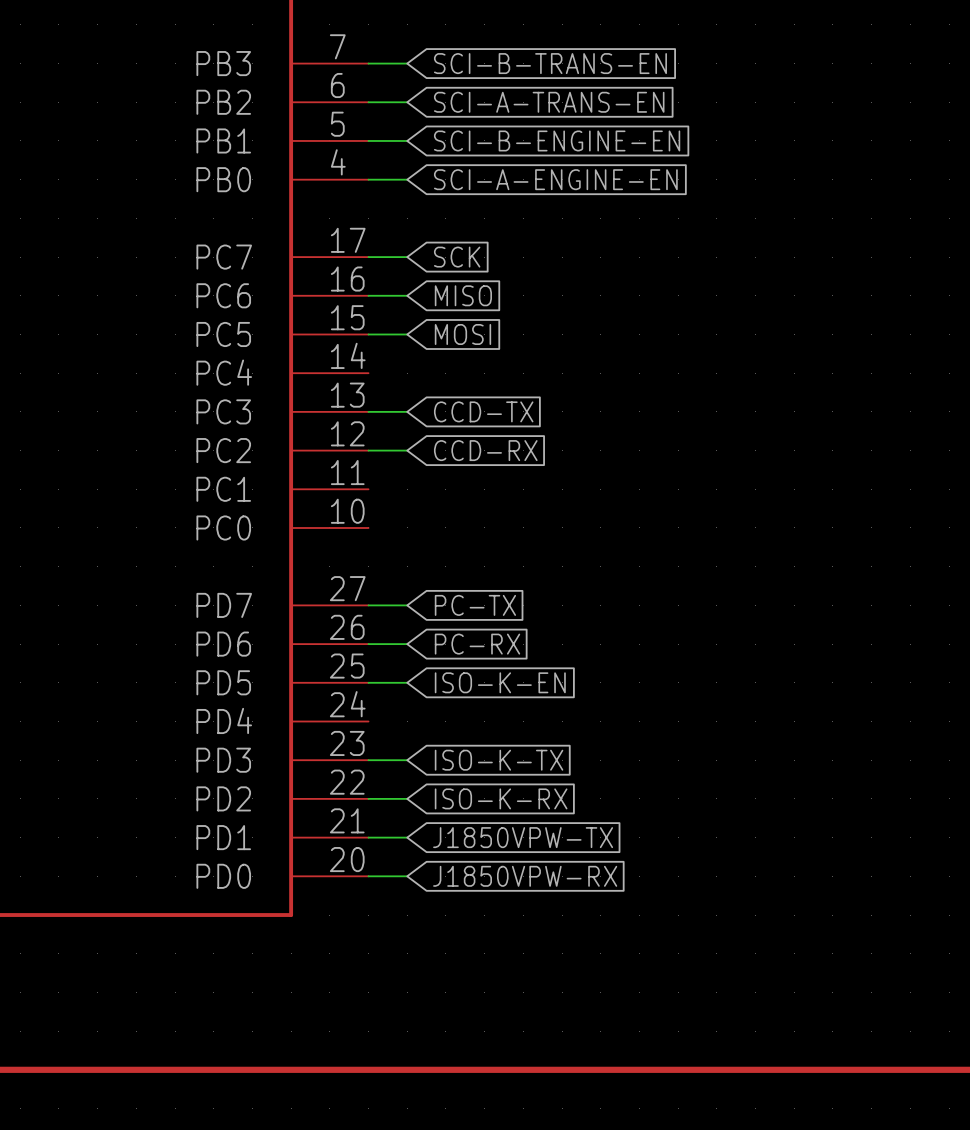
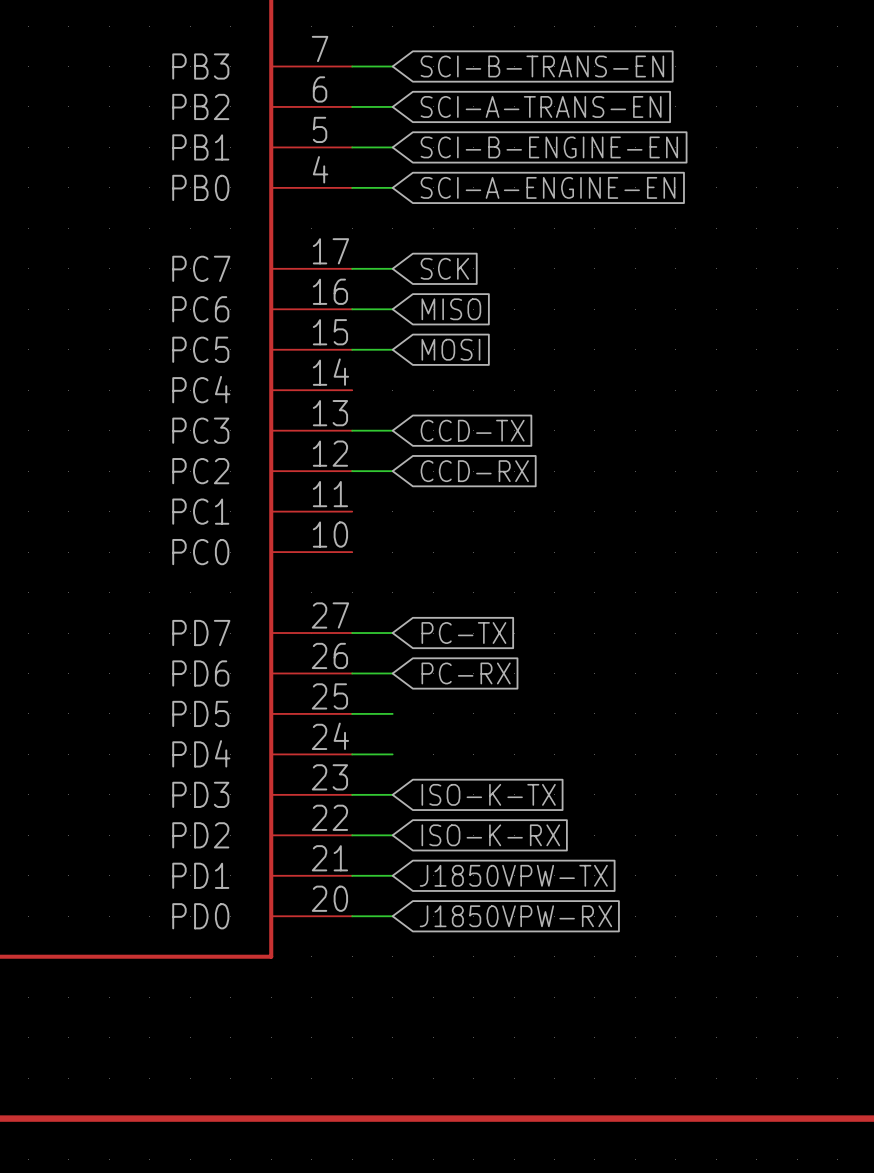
global label: ISO-K-EN (500, 682) -> none
wire: none -> (352, 754) (392, 754)

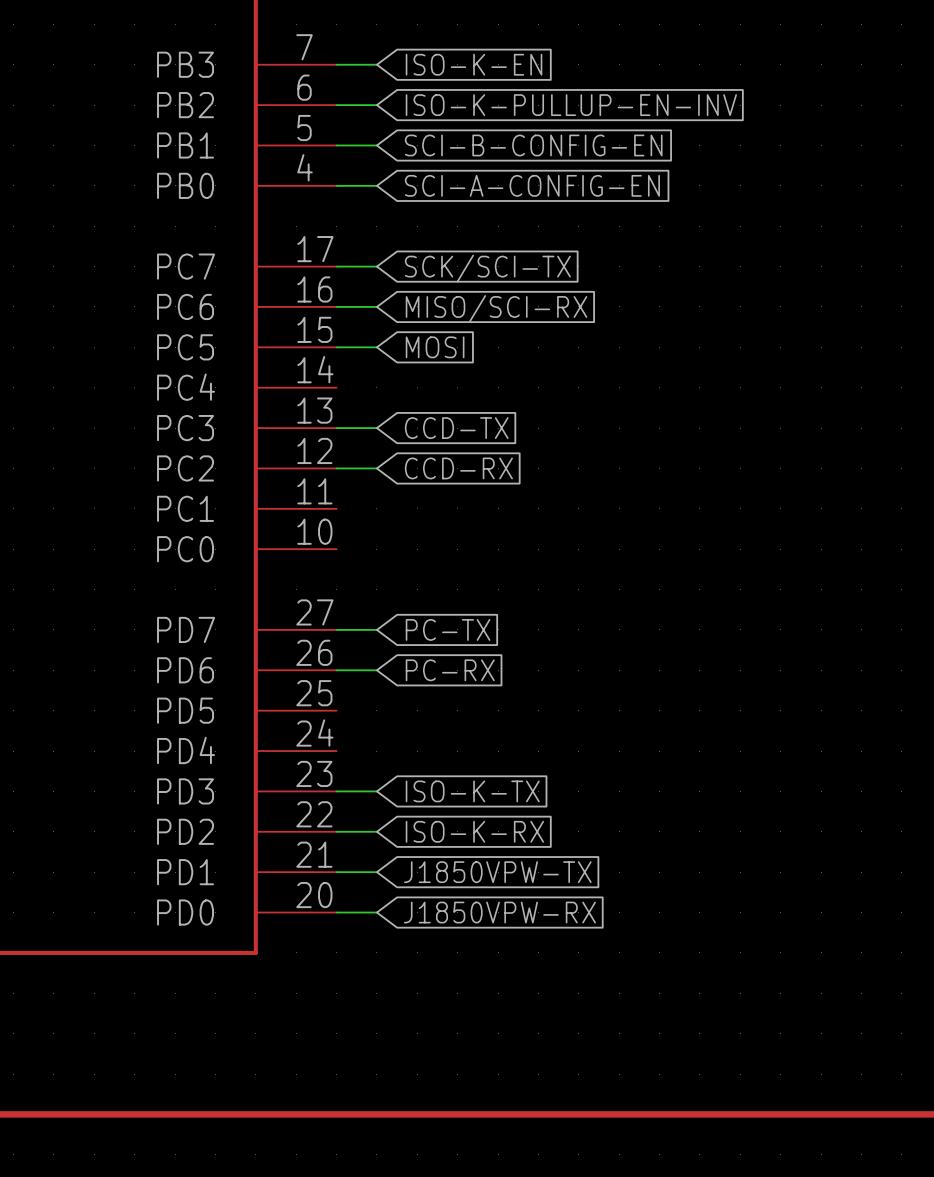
global label: SCI-B-TRANS-EN (542, 66) -> ISO-K-EN (474, 64)
global label: SCI-A-TRANS-EN (541, 106) -> ISO-K-PULLUP-EN-INV (571, 105)
global label: SCI-B-ENGINE-EN (549, 147) -> SCI-B-CONFIG-EN (533, 145)
global label: SCI-A-ENGINE-EN (548, 187) -> SCI-A-CONFIG-EN (532, 185)
global label: SCK (444, 268) -> SCK/SCI-TX (487, 268)
global label: MISO (451, 309) -> MISO/SCI-RX (496, 308)
wire: (352, 713) (392, 713) -> none
wire: (352, 754) (392, 754) -> none

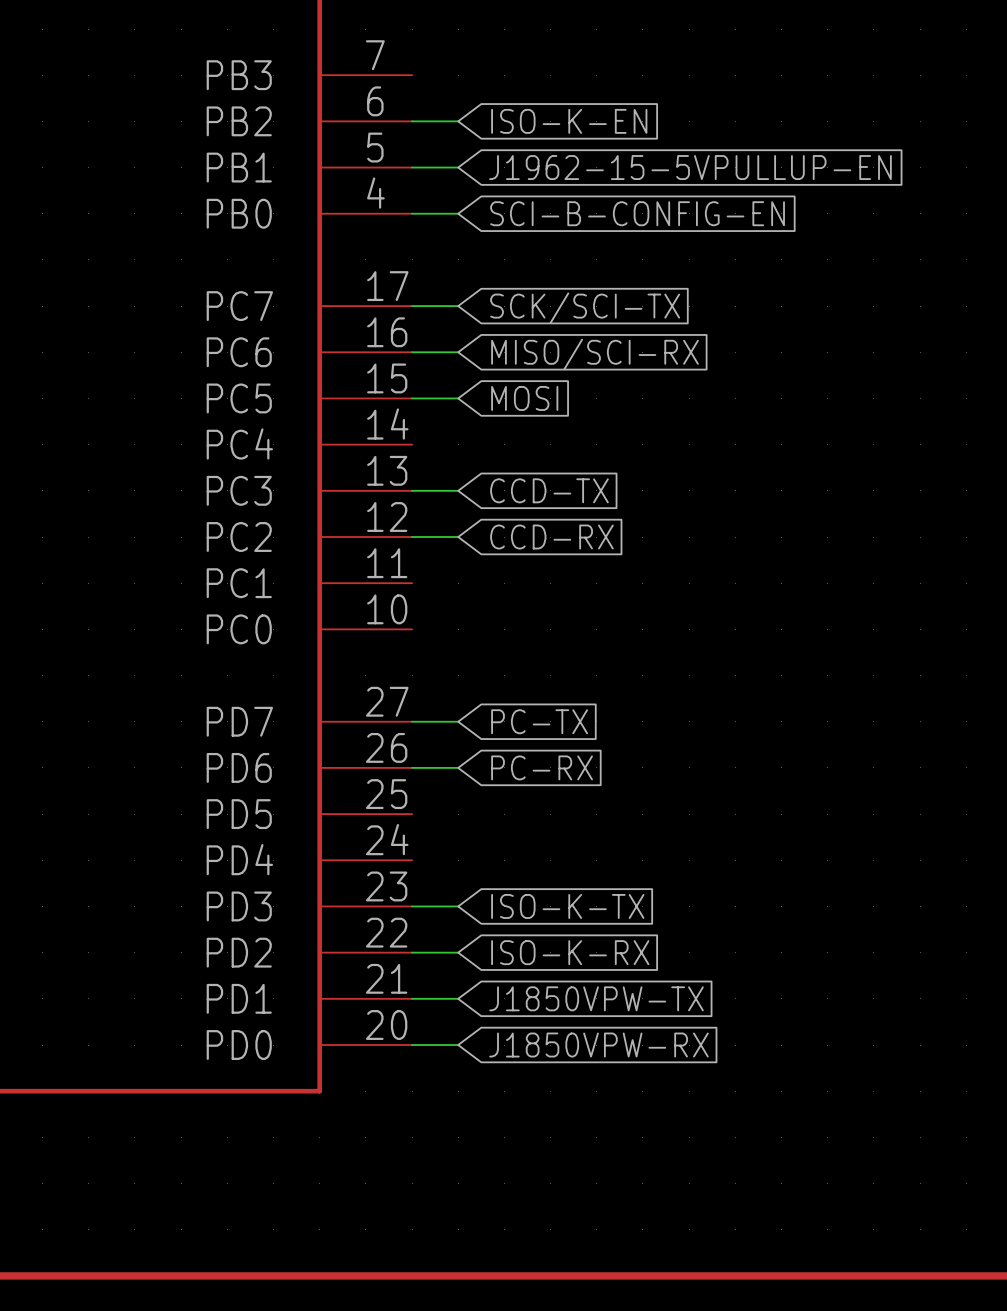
wire: (336, 64) (376, 64) -> none
global label: ISO-K-EN (474, 64) -> none
global label: ISO-K-PULLUP-EN-INV (571, 105) -> ISO-K-EN (569, 121)
global label: SCI-B-CONFIG-EN (533, 145) -> J1962-15-5VPULLUP-EN (690, 167)
global label: SCI-A-CONFIG-EN (532, 185) -> SCI-B-CONFIG-EN (637, 213)

